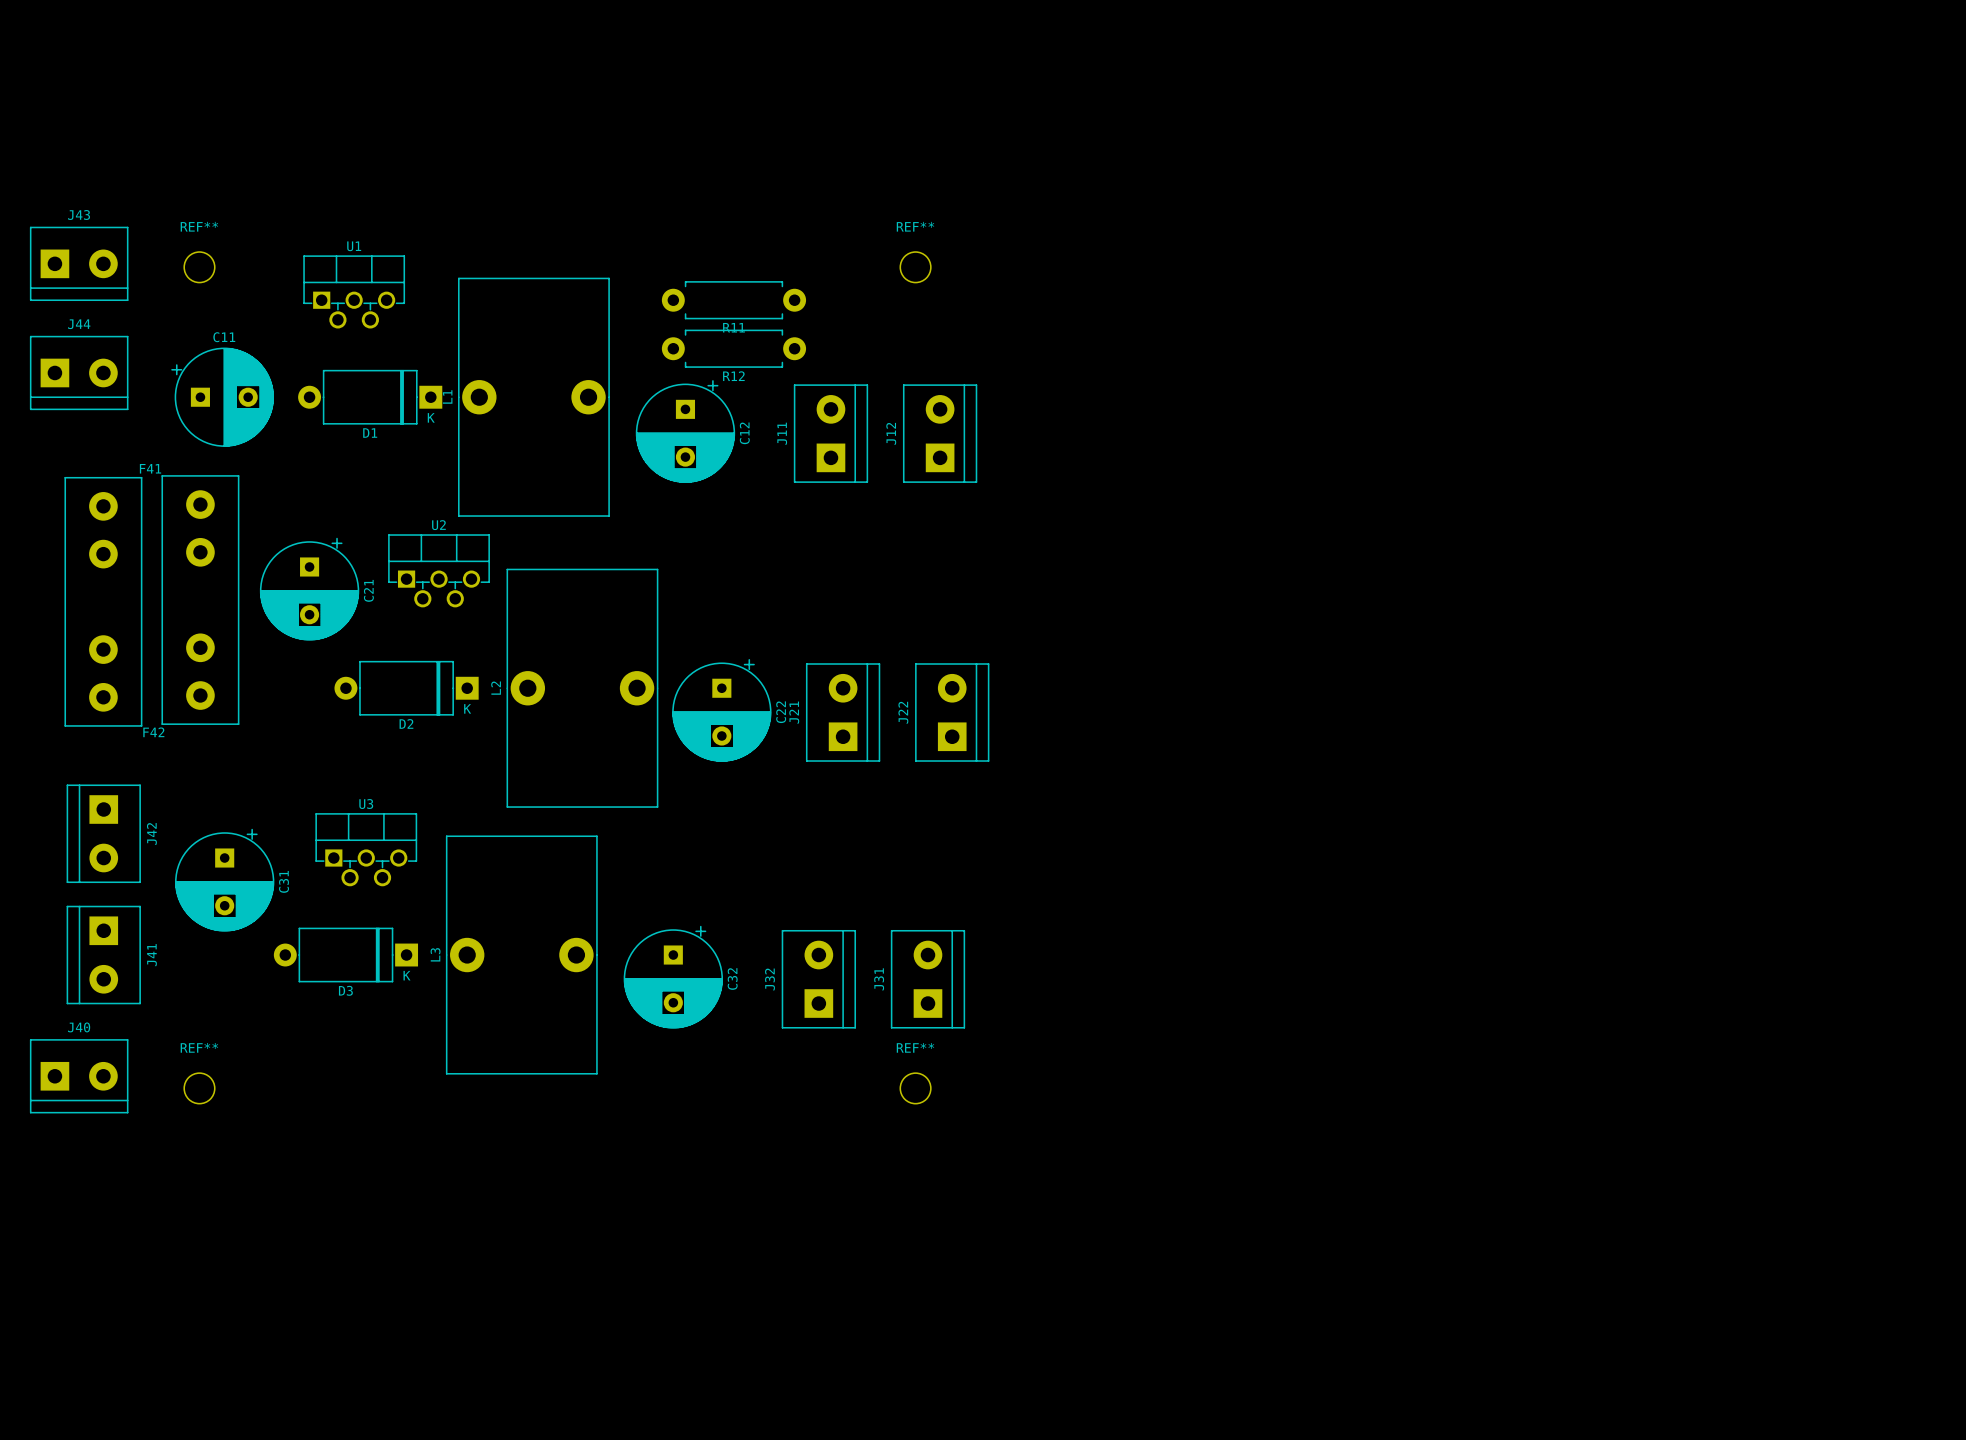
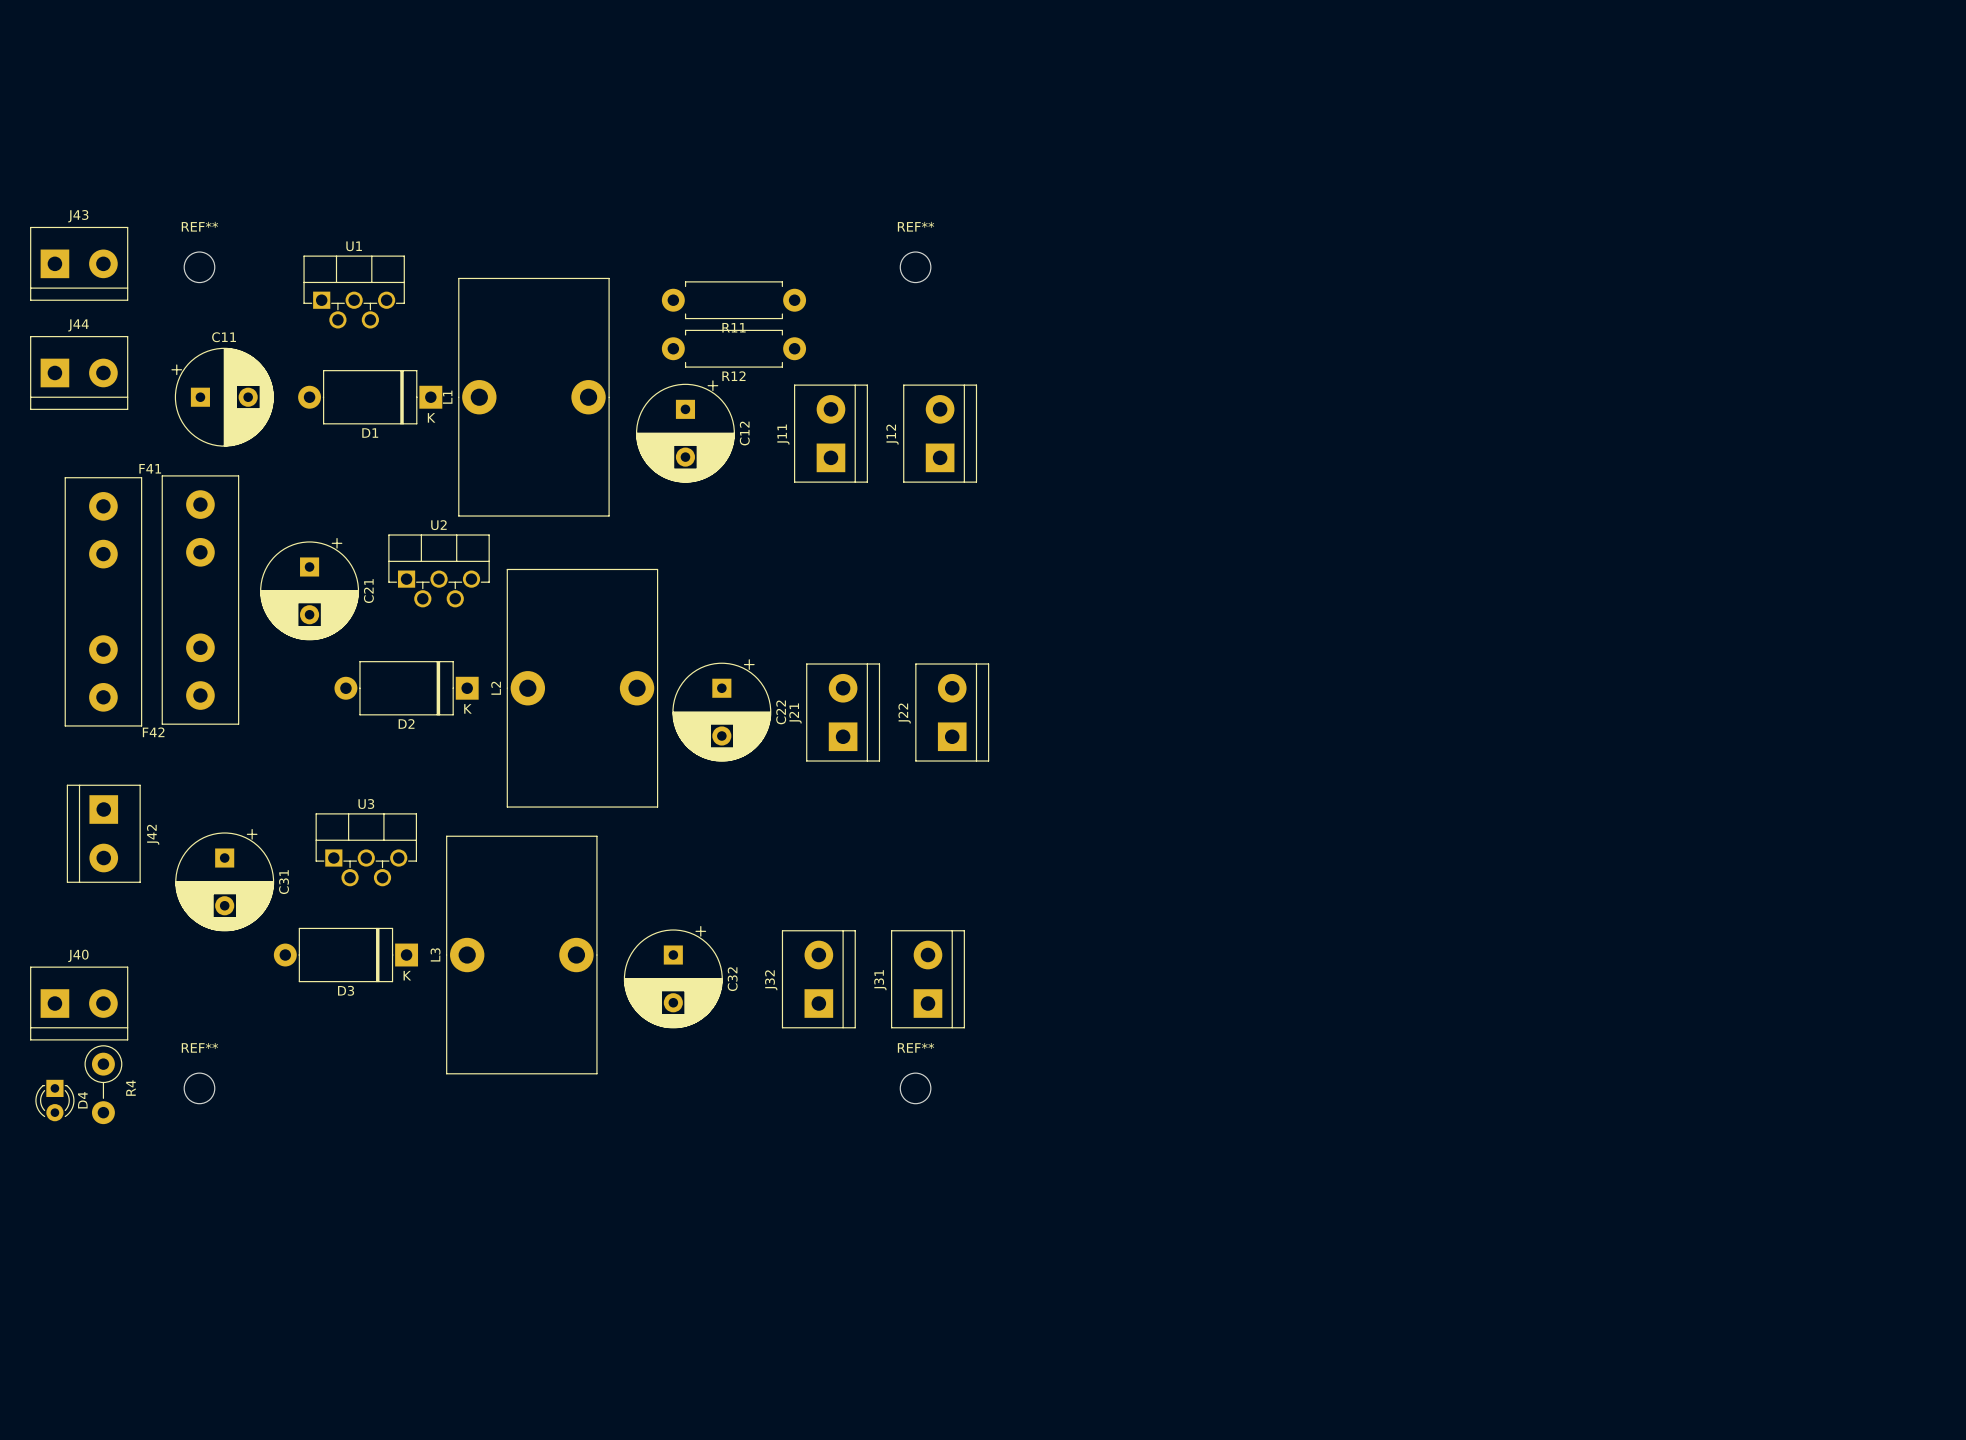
J41: (103, 955) -> none
J40 position: (79, 1076) -> (79, 1003)
R4: none -> (103, 1084)
D4: none -> (54, 1100)

